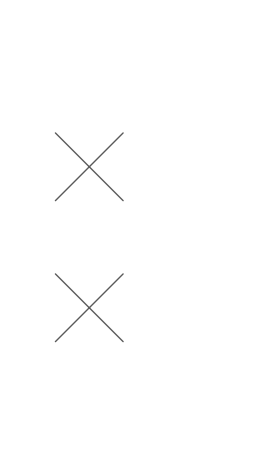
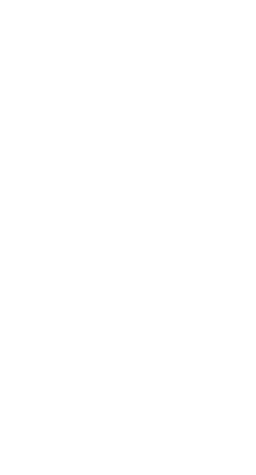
no-connect mark: (89, 166) -> none
no-connect mark: (89, 307) -> none

